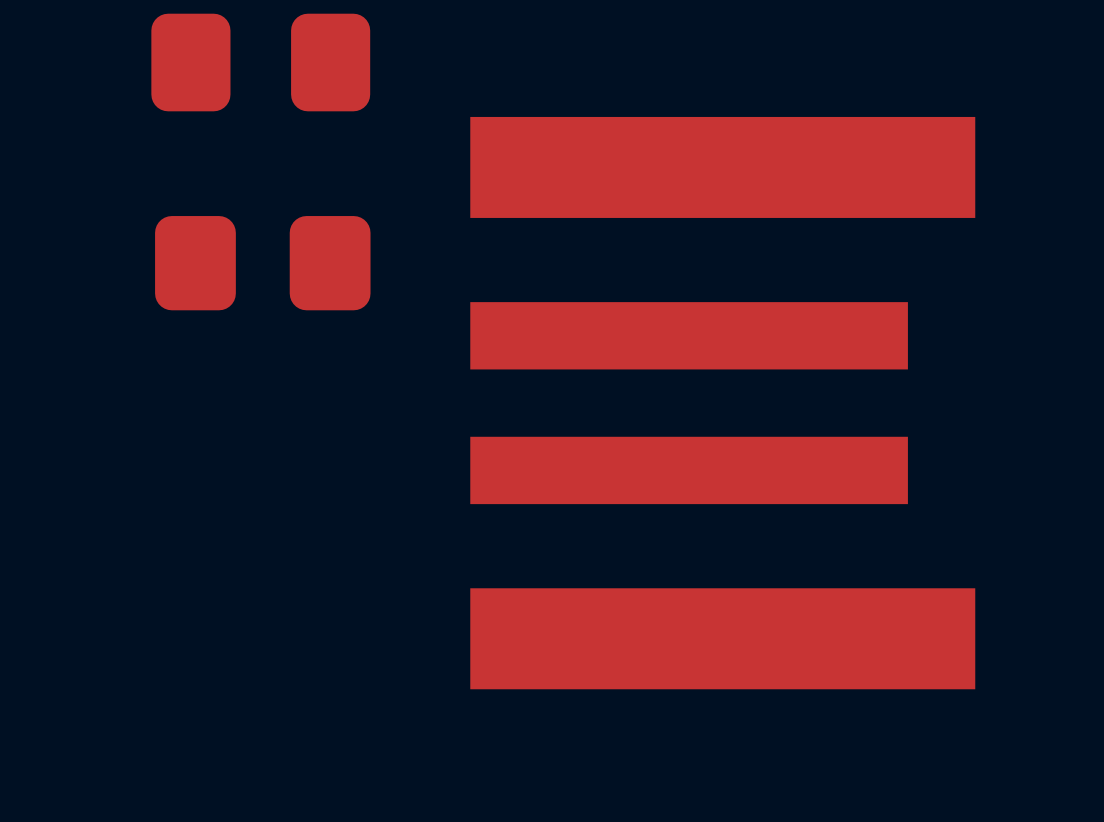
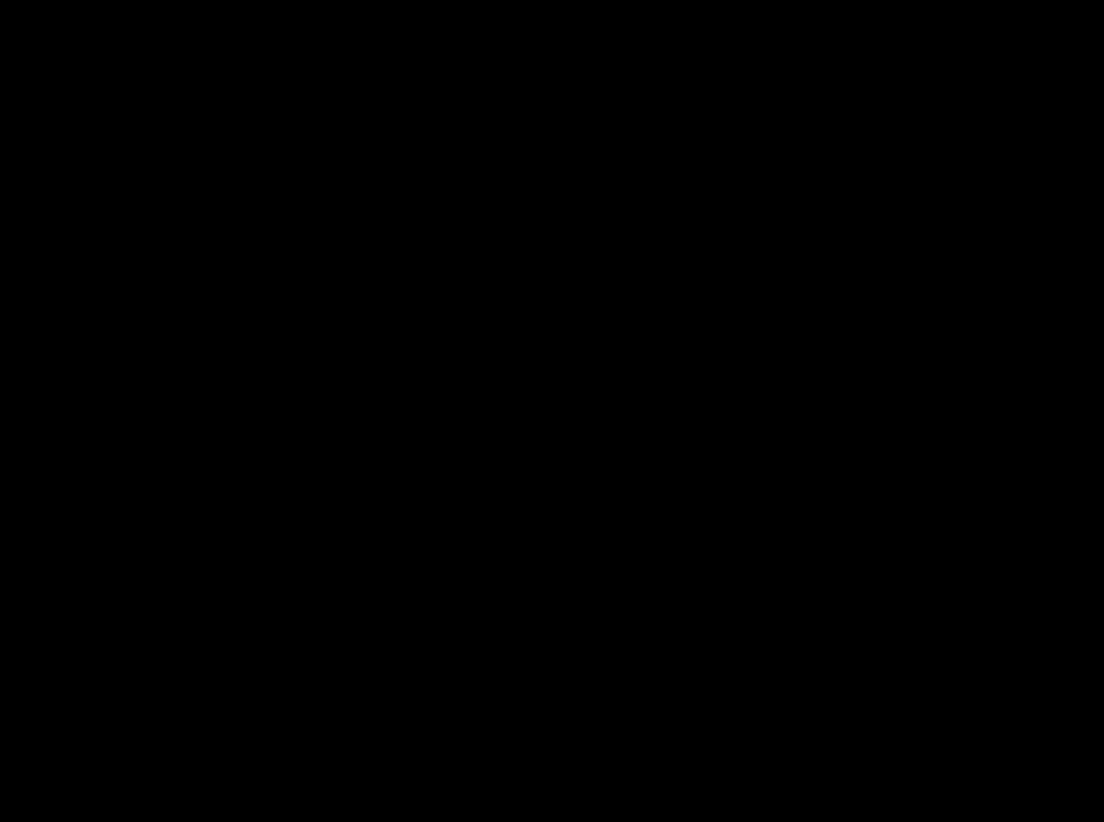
part: (260, 62) -> none
part: (262, 263) -> none
part: (722, 403) -> none

